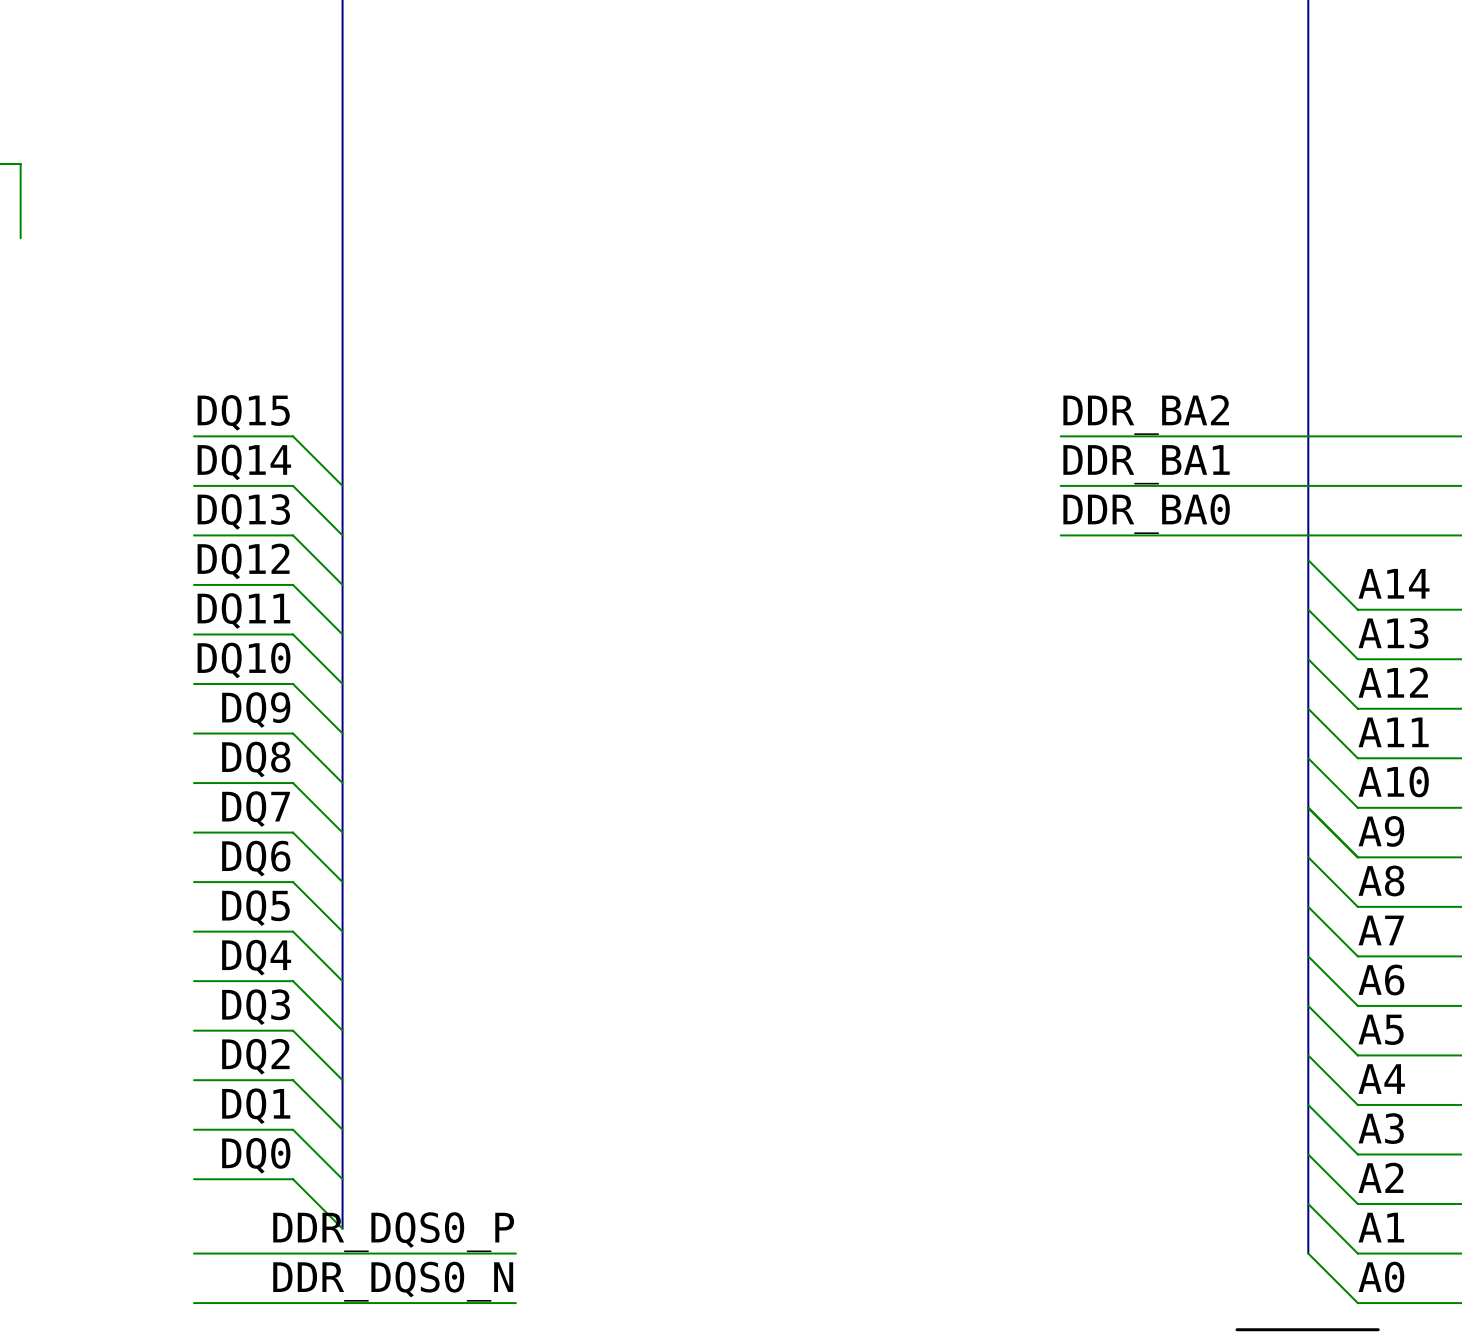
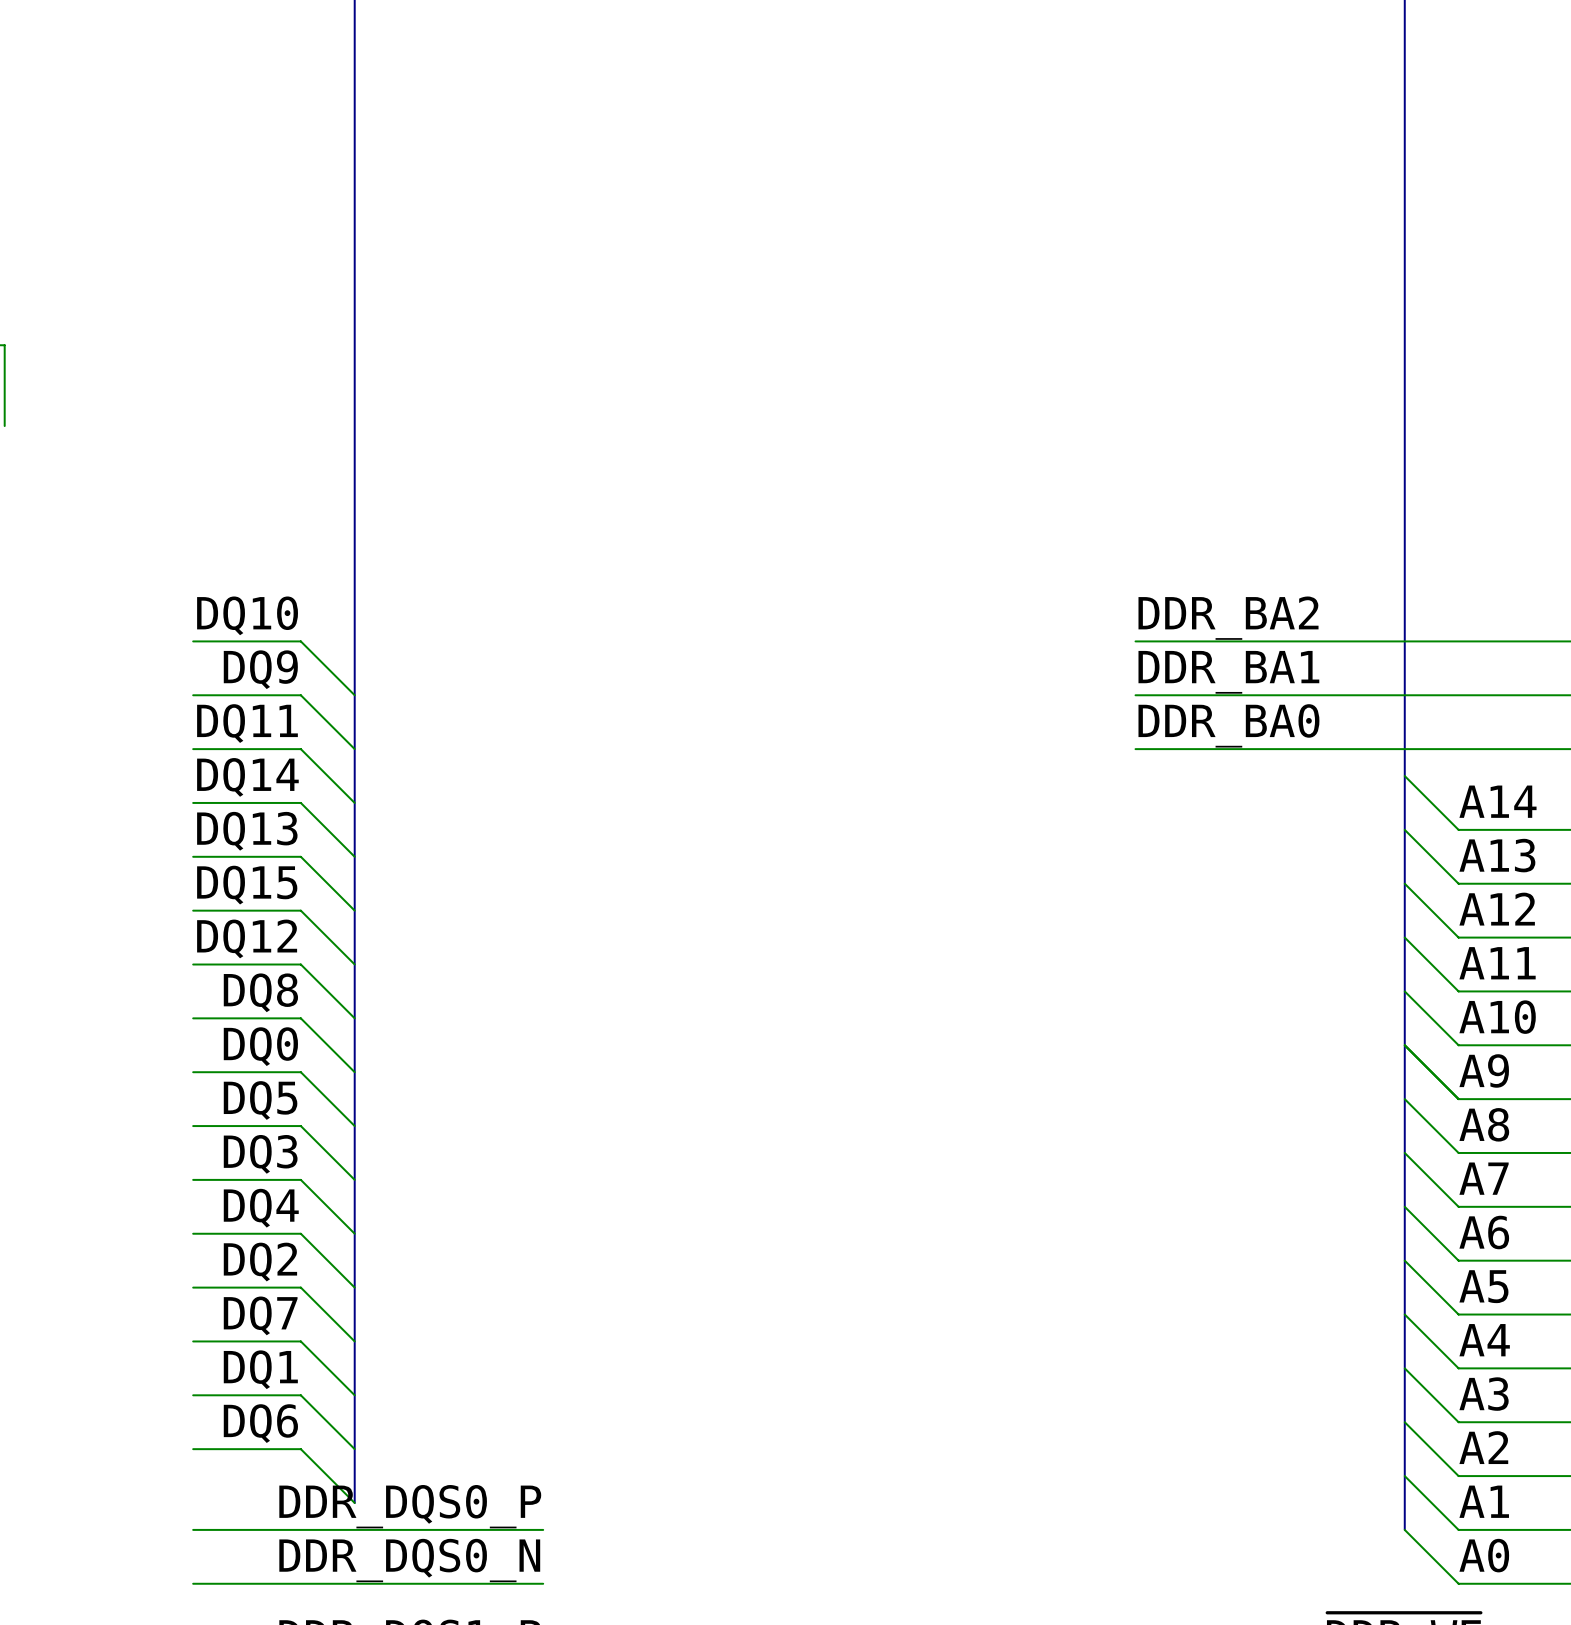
label: DQ15 (243, 412) -> DQ10 (247, 615)
label: DQ14 (244, 462) -> DQ9 (260, 669)
label: DQ13 (243, 511) -> DQ11 (247, 723)
label: DQ12 (243, 561) -> DQ14 (247, 777)
label: DQ11 (243, 610) -> DQ13 (247, 831)
label: DQ10 (244, 660) -> DQ15 (247, 885)
label: DQ9 (256, 710) -> DQ12 (247, 938)
label: DQ7 (256, 809) -> DQ0 (260, 1046)
label: DQ6 (256, 858) -> DQ5 (260, 1100)
label: DQ5 (255, 908) -> DQ3 (260, 1154)
label: DQ3 (256, 1007) -> DQ2 (260, 1262)
label: DQ2 (255, 1056) -> DQ7 (260, 1315)
label: DQ0 (256, 1155) -> DQ6 (260, 1423)

